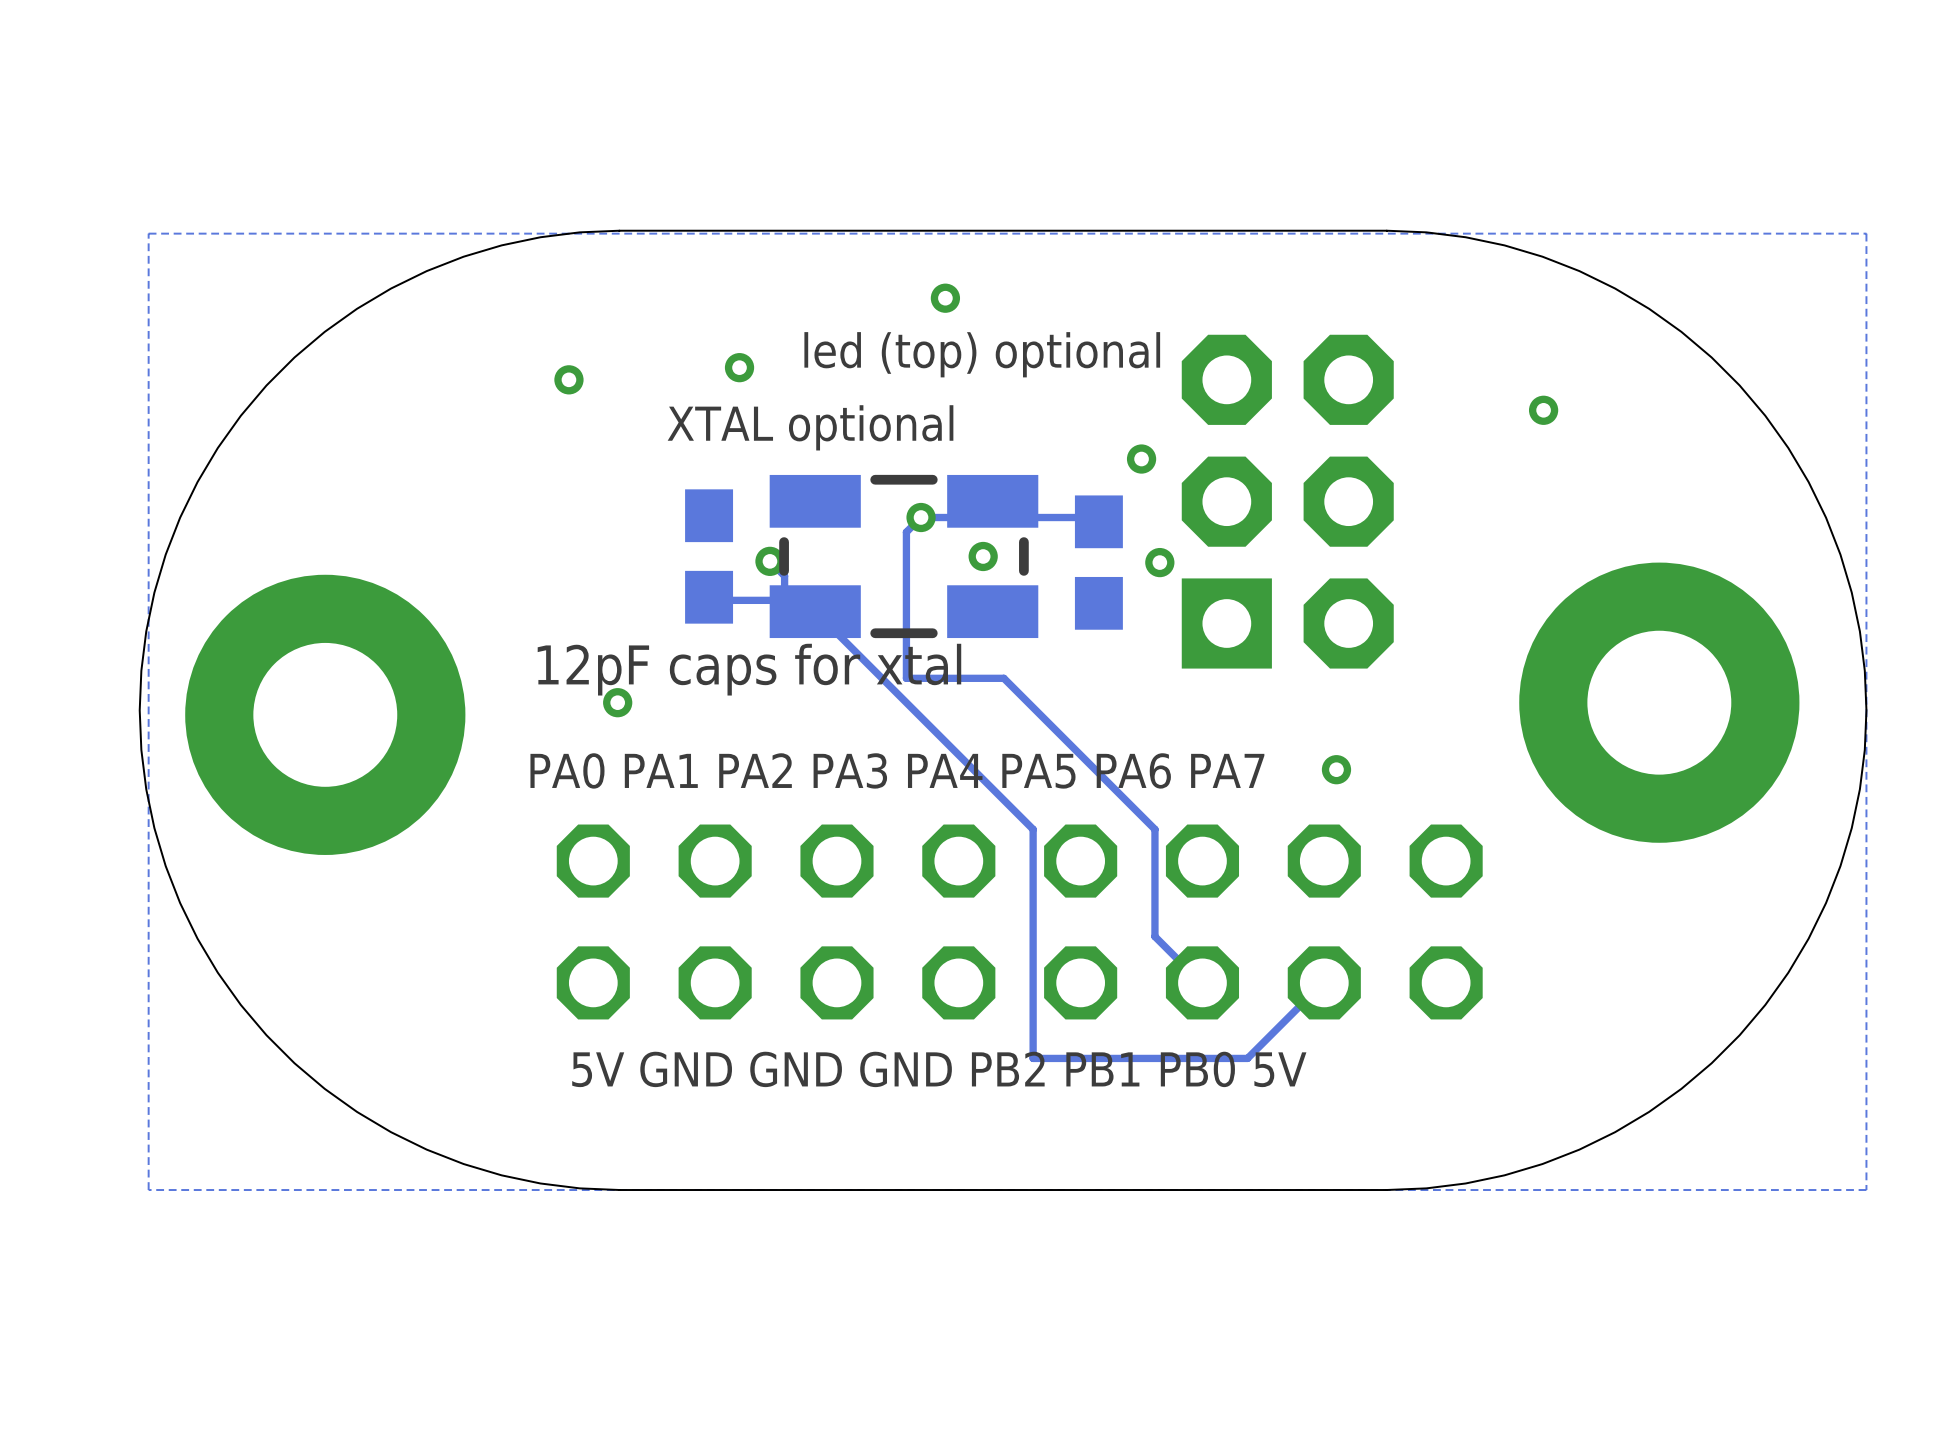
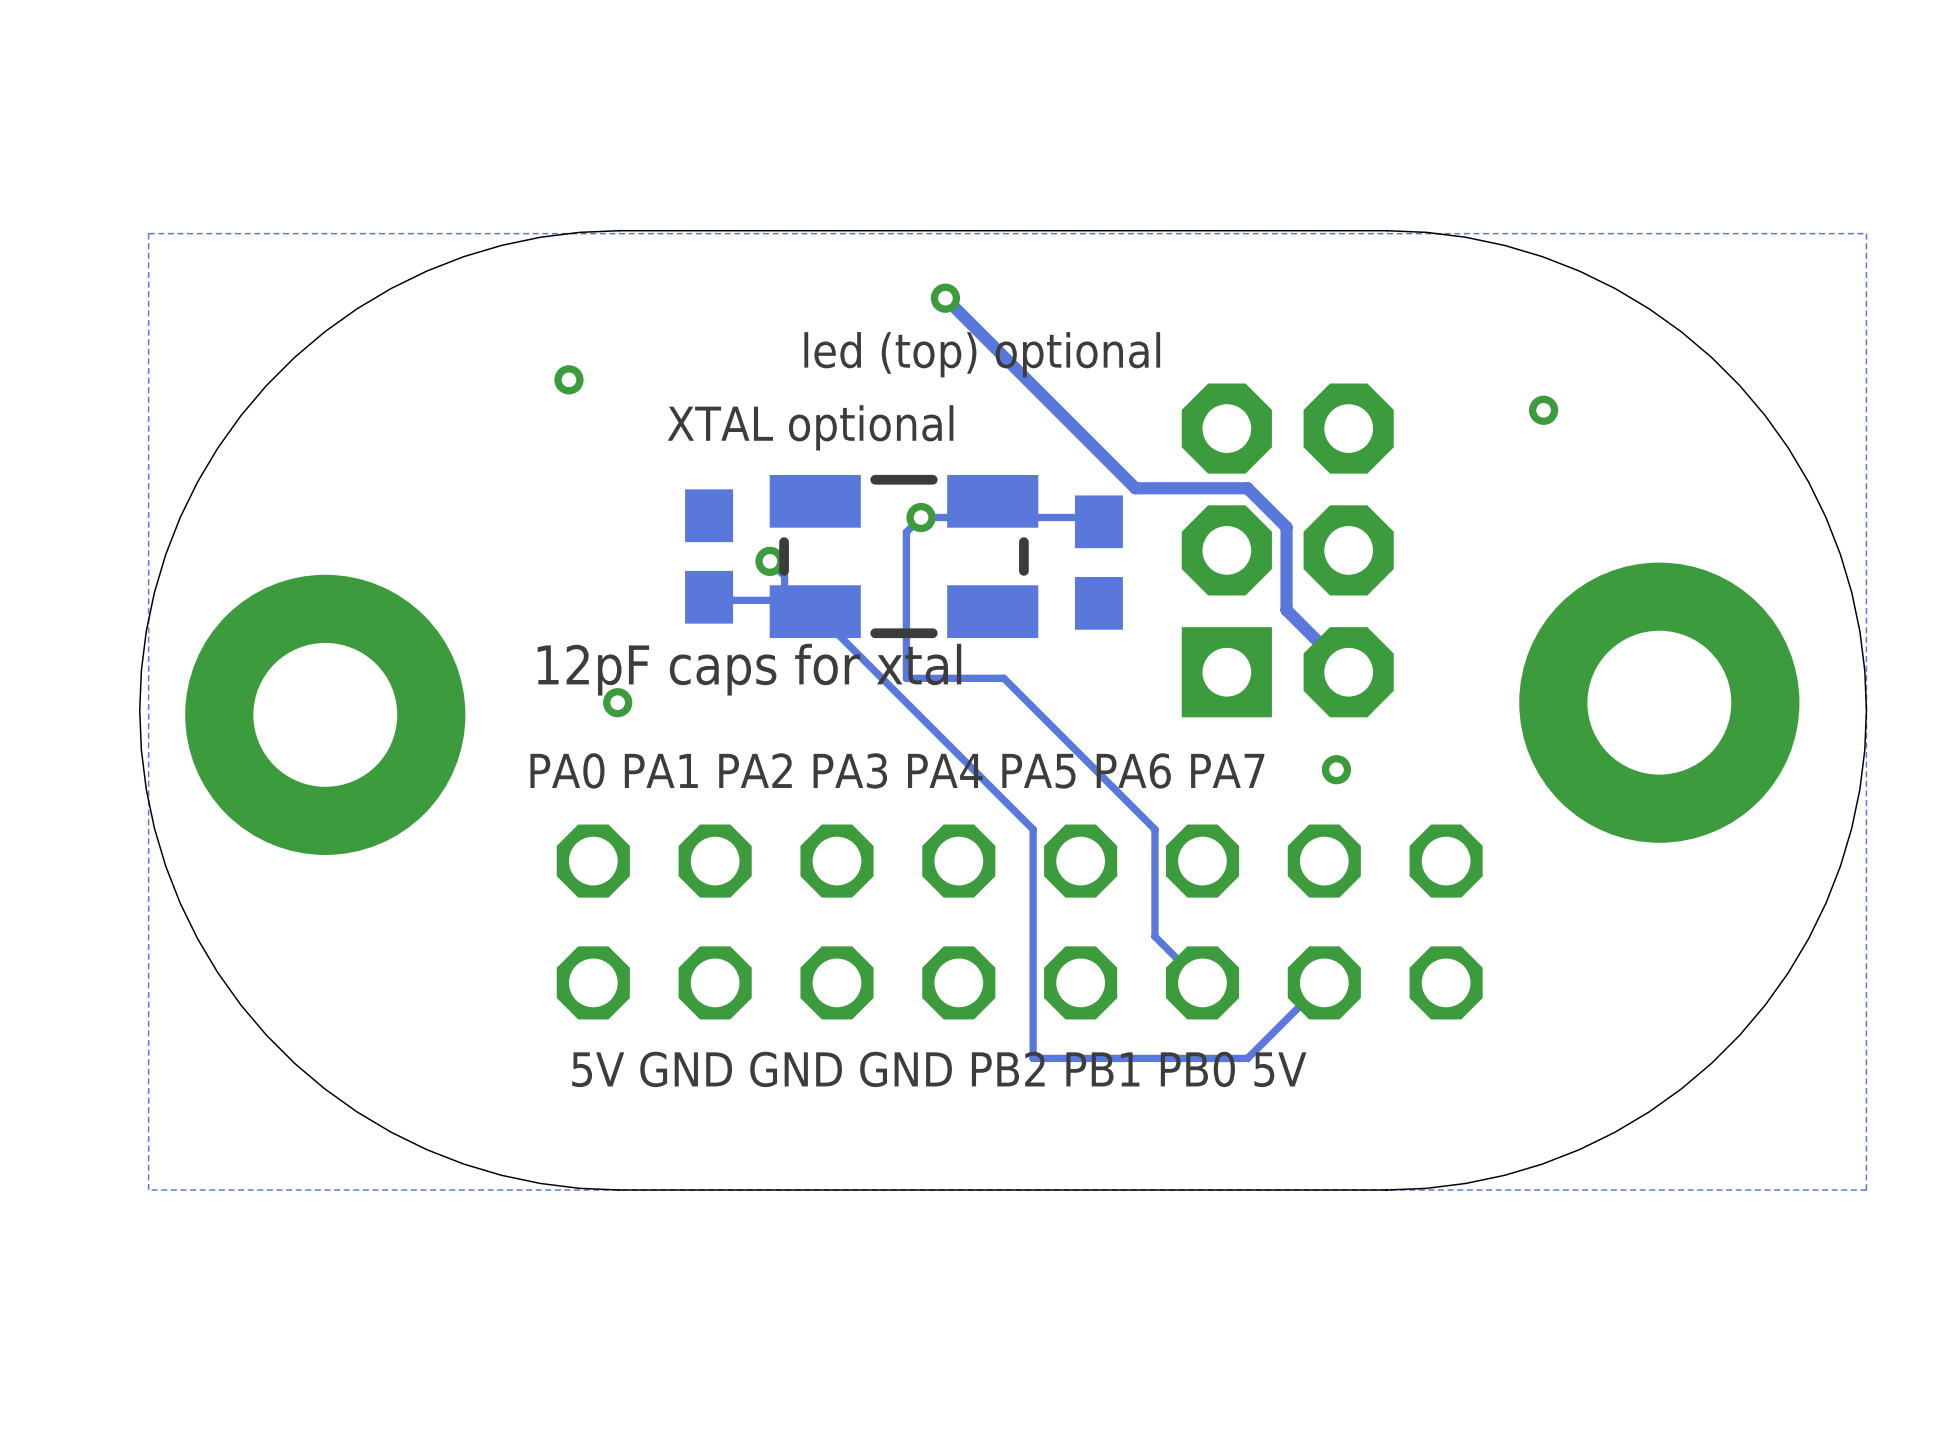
track: none -> (945, 298) (1135, 488) (1247, 488) (1286, 527) (1286, 610) (1348, 672)
via: (739, 367) -> none
via: (1141, 459) -> none
part position: (1287, 501) -> (1287, 550)
via: (983, 556) -> none
via: (1159, 562) -> none

